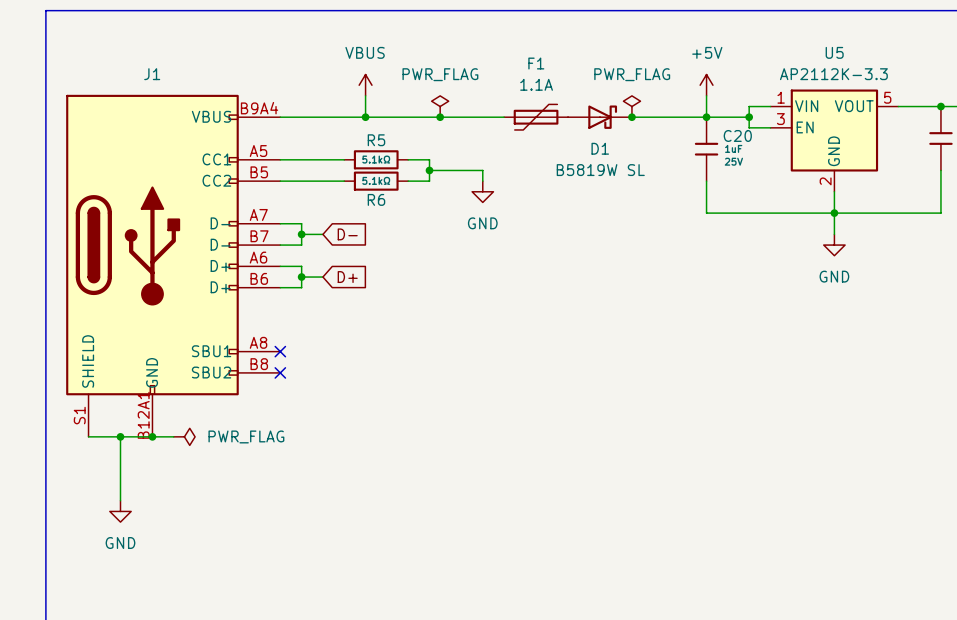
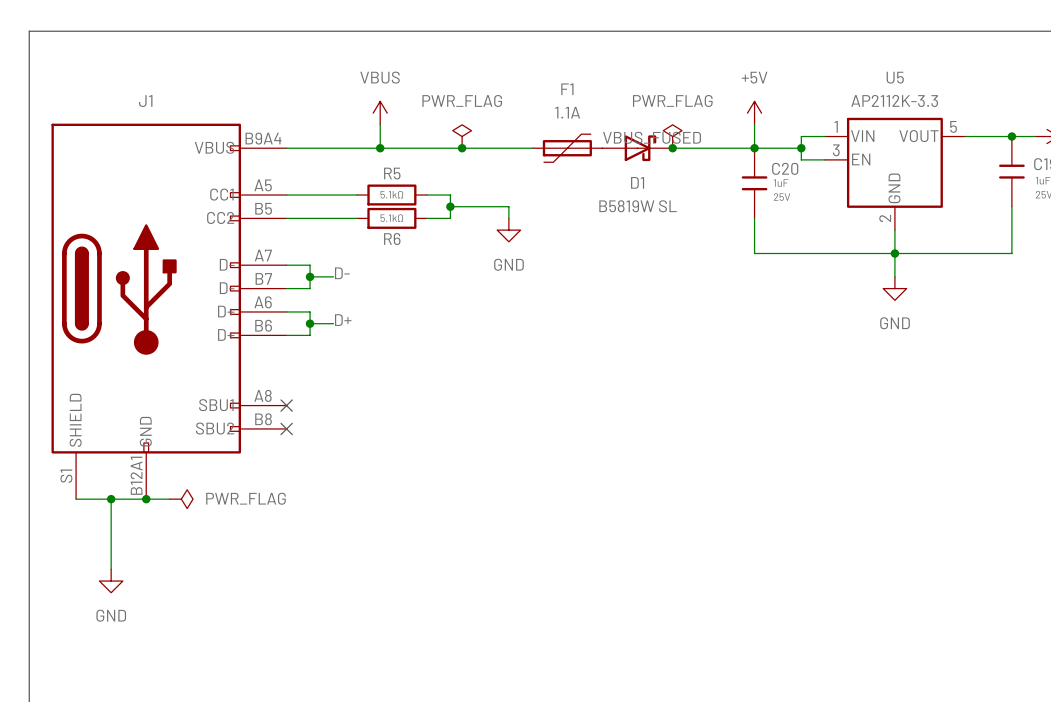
label: none -> VBUS_FUSED (652, 137)
label: none -> D- (342, 273)
global label: D- (347, 234) -> none
label: none -> D+ (343, 320)
global label: D+ (347, 277) -> none

